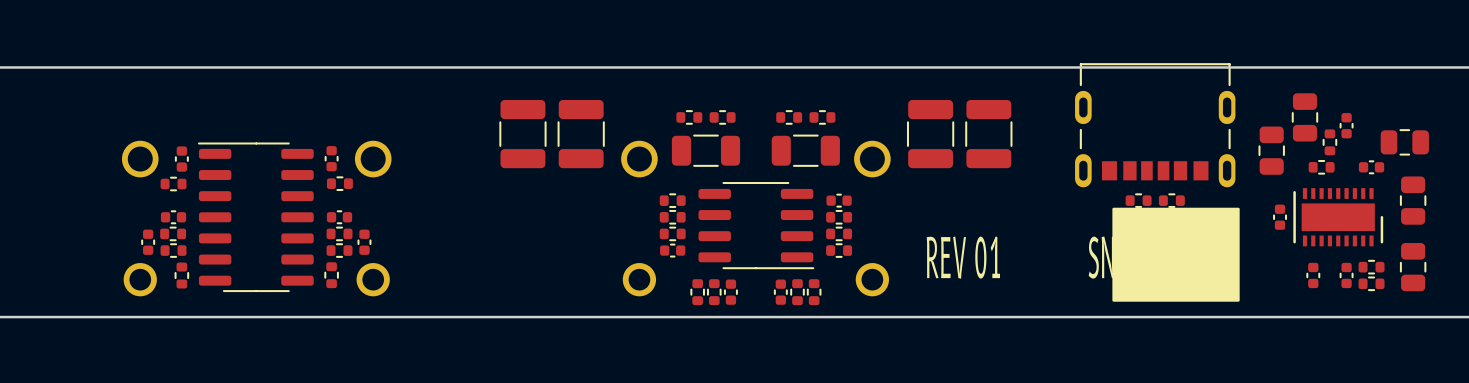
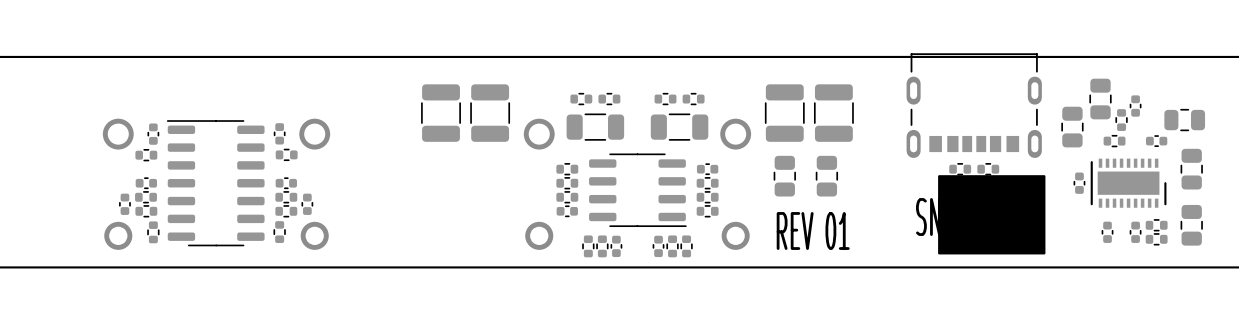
part: none -> (784, 176)
part: none -> (826, 176)
text position: REV 01 (963, 257) -> REV 01 (813, 230)

